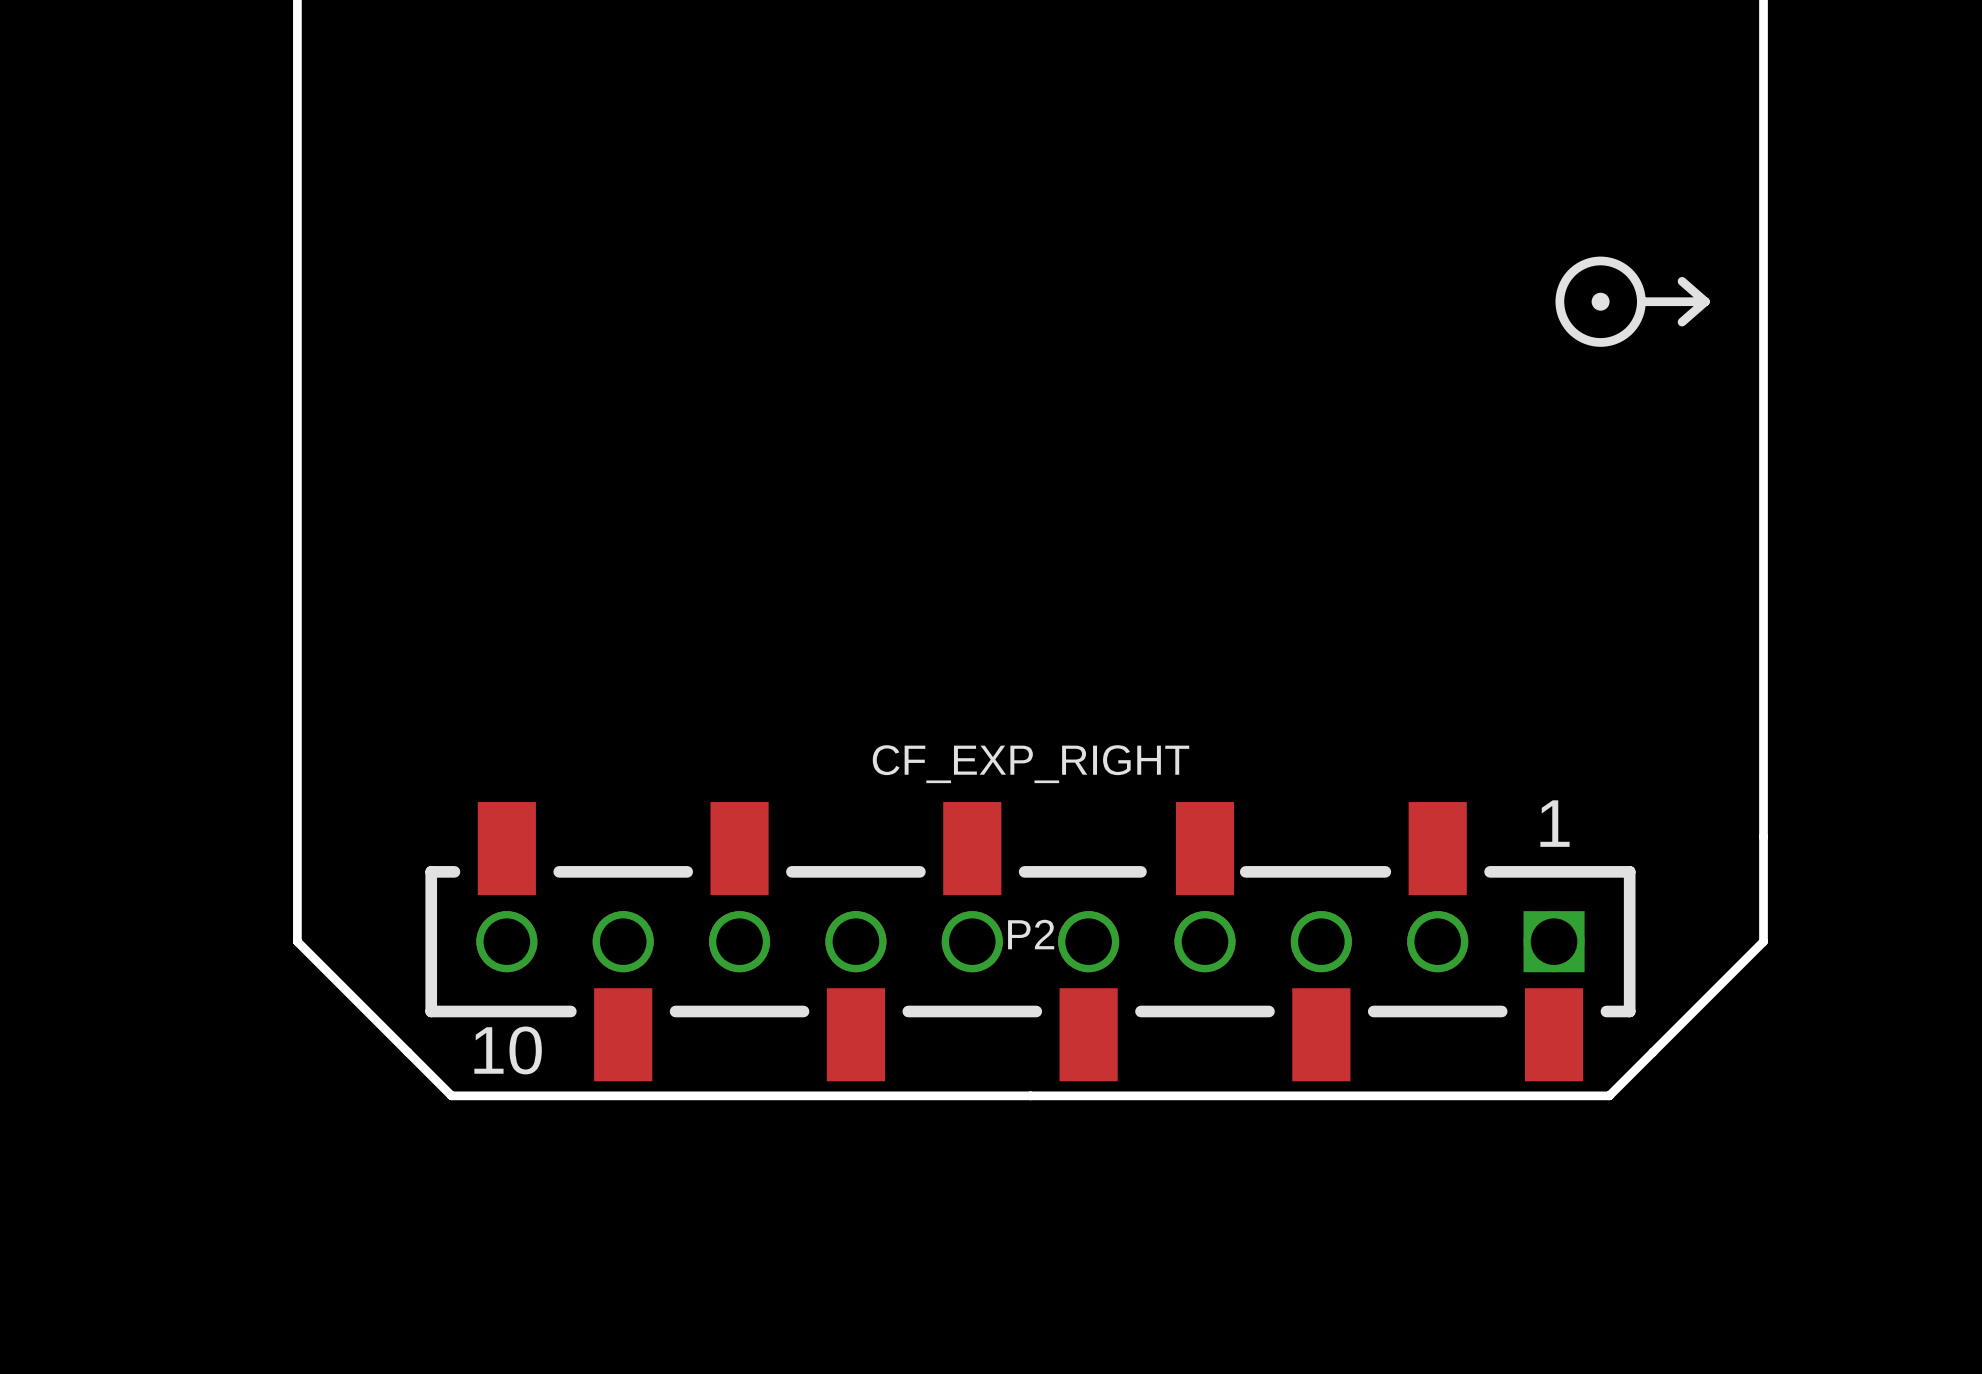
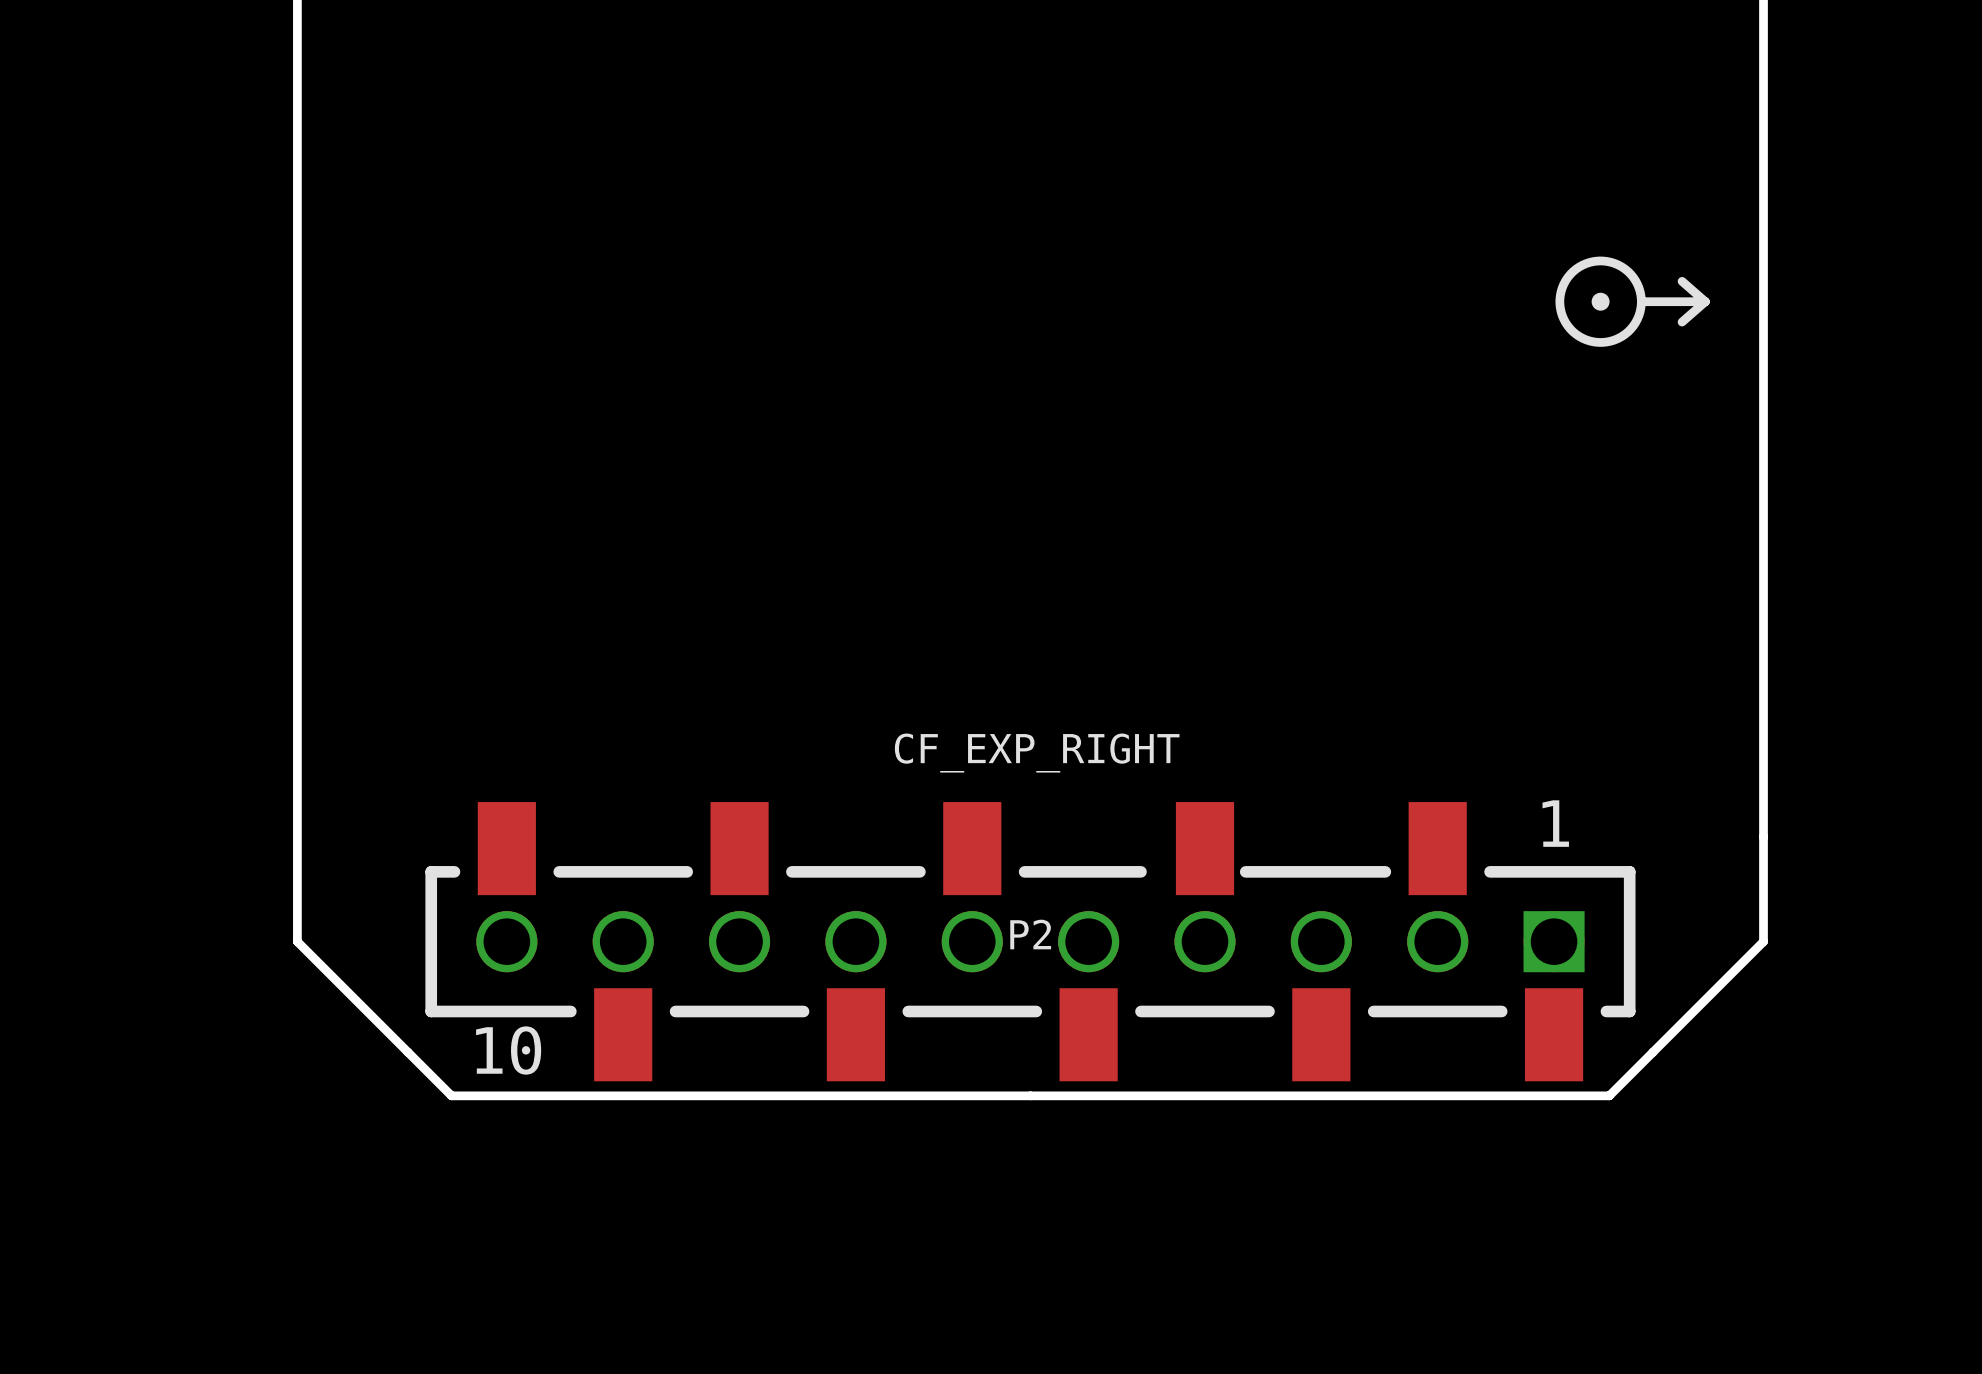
P2 value position: CF_EXP_RIGHT (1030, 764) -> CF_EXP_RIGHT (1037, 753)

